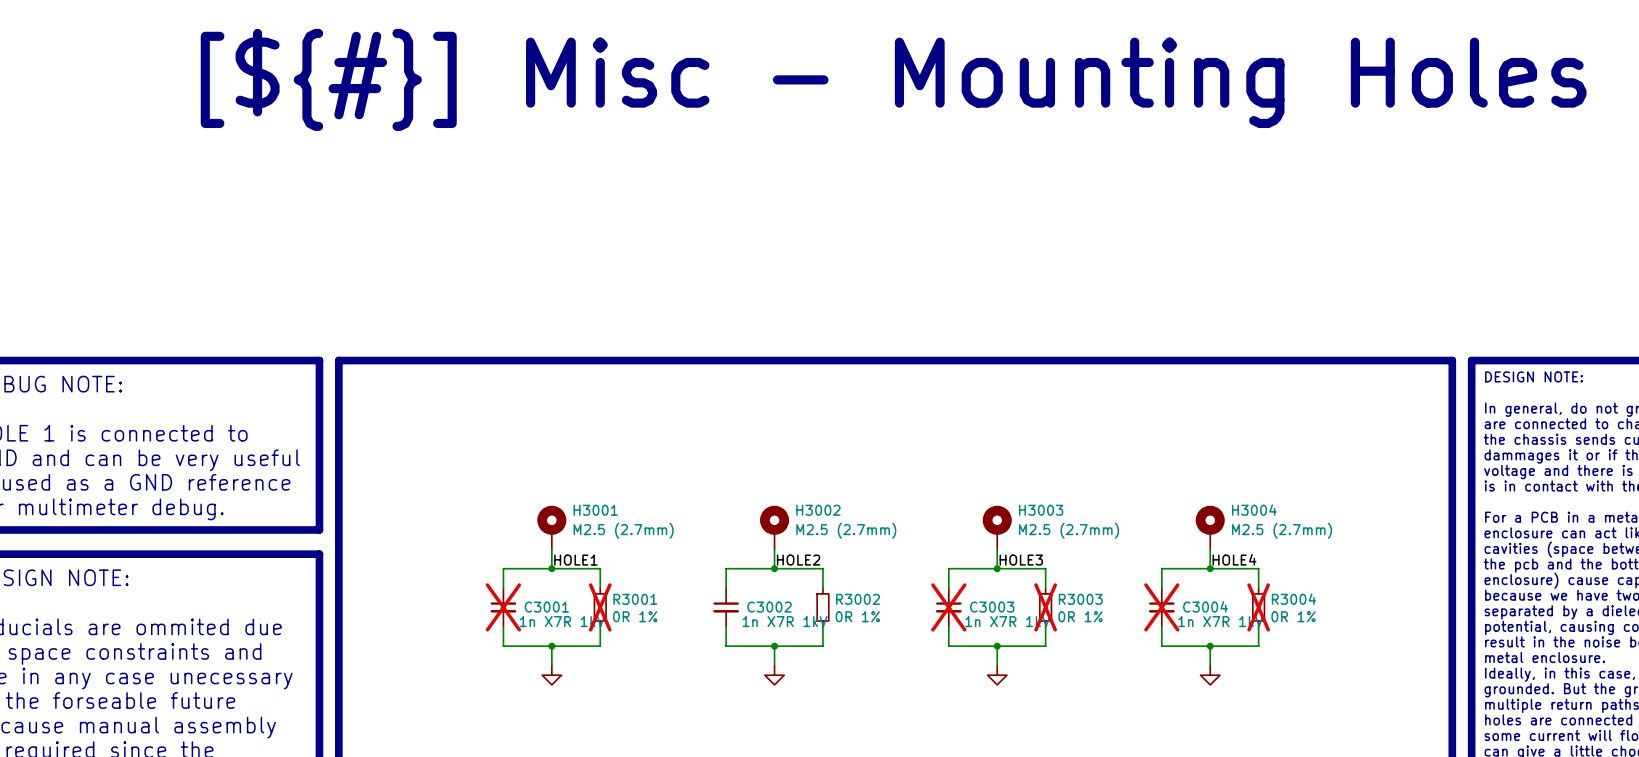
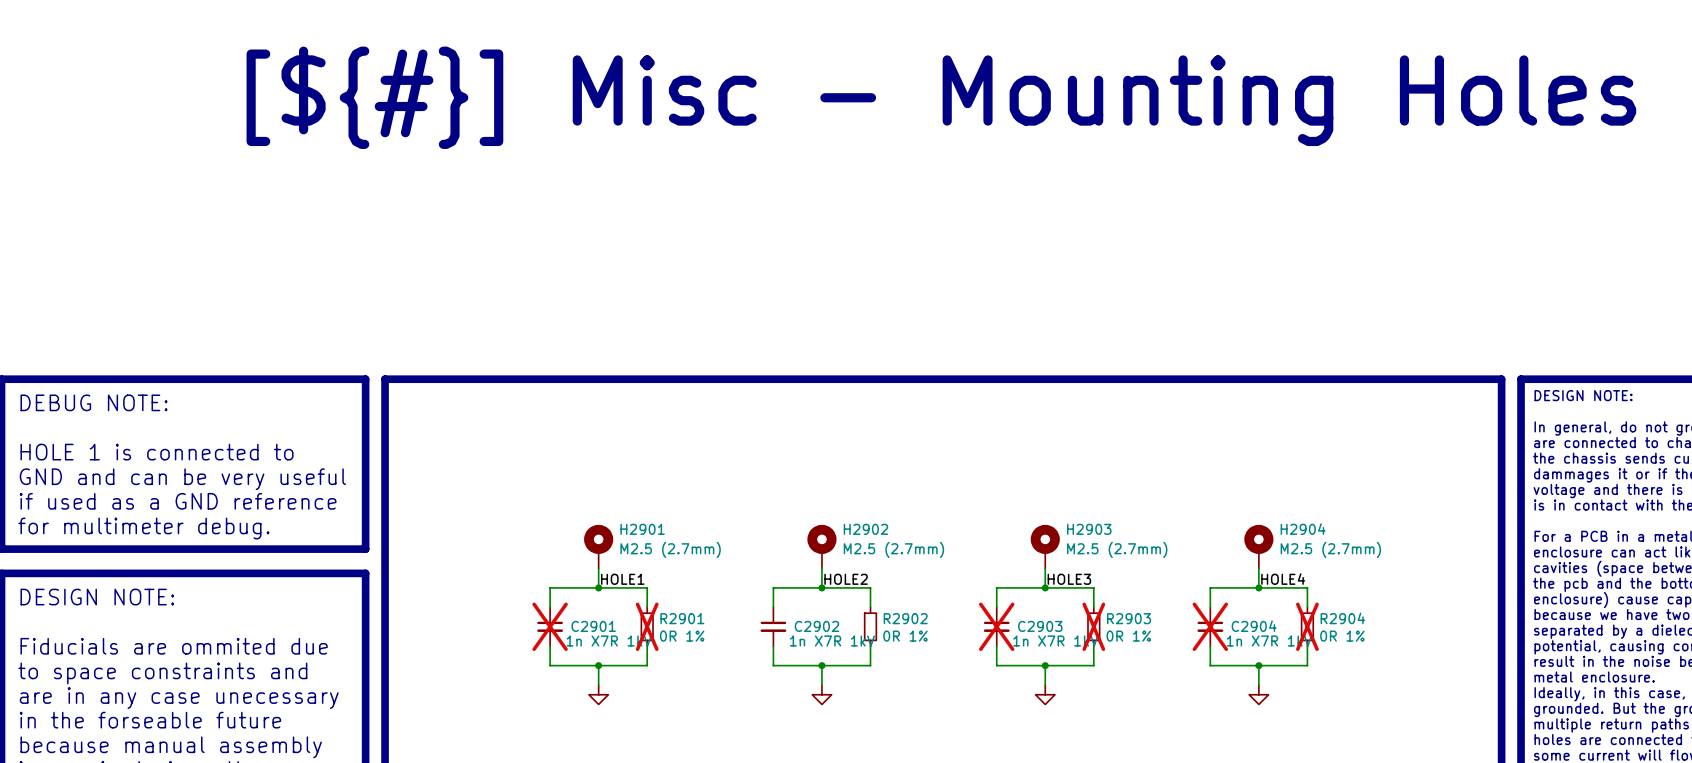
H3001 name: H3001 (595, 510) -> H2901 (642, 529)
H3002 name: H3002 (818, 510) -> H2902 (865, 529)
H3003 name: H3003 (1041, 510) -> H2903 (1089, 529)
H3004 name: H3004 (1254, 510) -> H2904 (1303, 529)
R3001 name: R3001 (635, 599) -> R2901 (682, 618)
R3002 name: R3002 (858, 599) -> R2902 (905, 618)
R3003 name: R3003 (1080, 599) -> R2903 (1129, 618)
R3004 name: R3004 (1293, 599) -> R2904 (1342, 618)
C3004 name: C3004 (1205, 606) -> C2904 (1254, 626)
C3001 name: C3001 (546, 607) -> C2901 (593, 626)
C3002 name: C3002 (769, 607) -> C2902 (816, 626)
C3003 name: C3003 (992, 607) -> C2903 (1040, 626)

